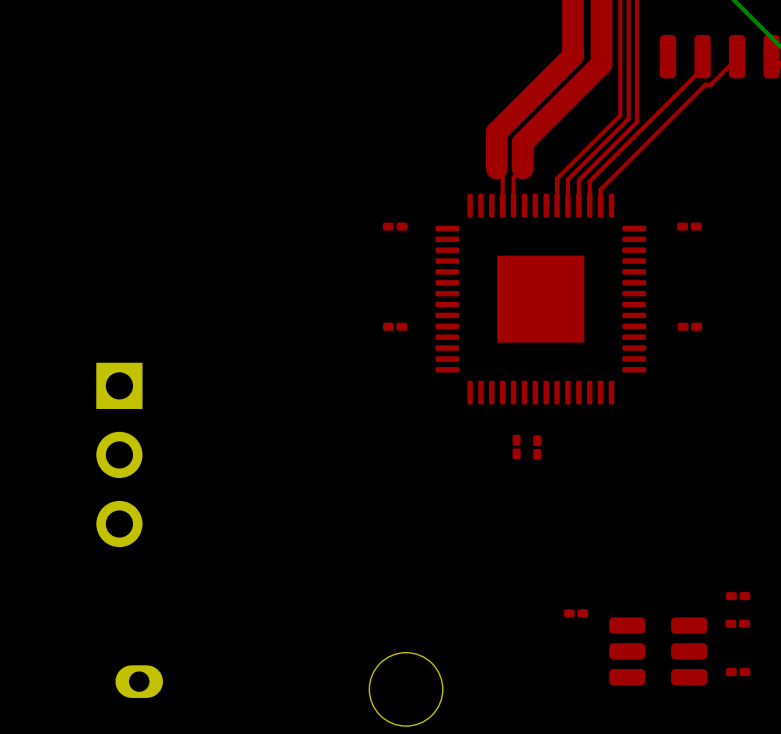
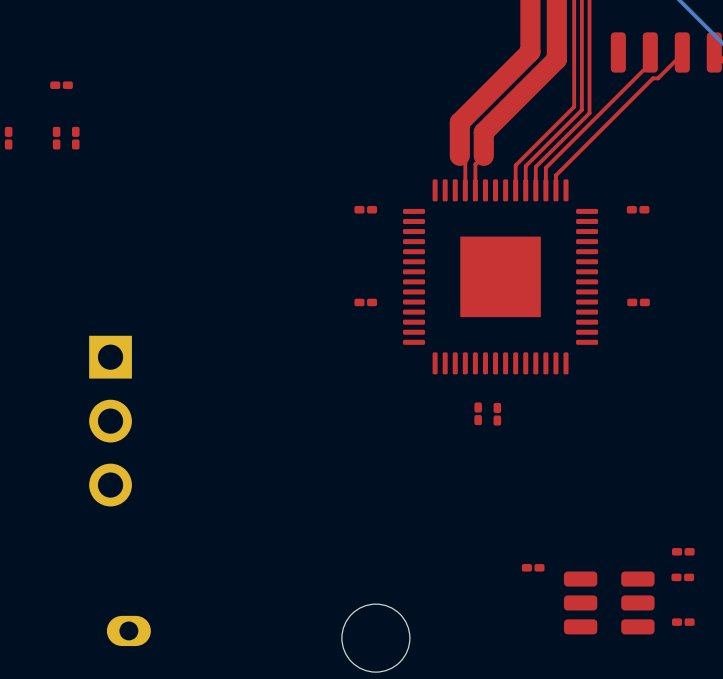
part: none -> (61, 85)
part: none -> (8, 138)
part: none -> (56, 138)
part: none -> (75, 138)

